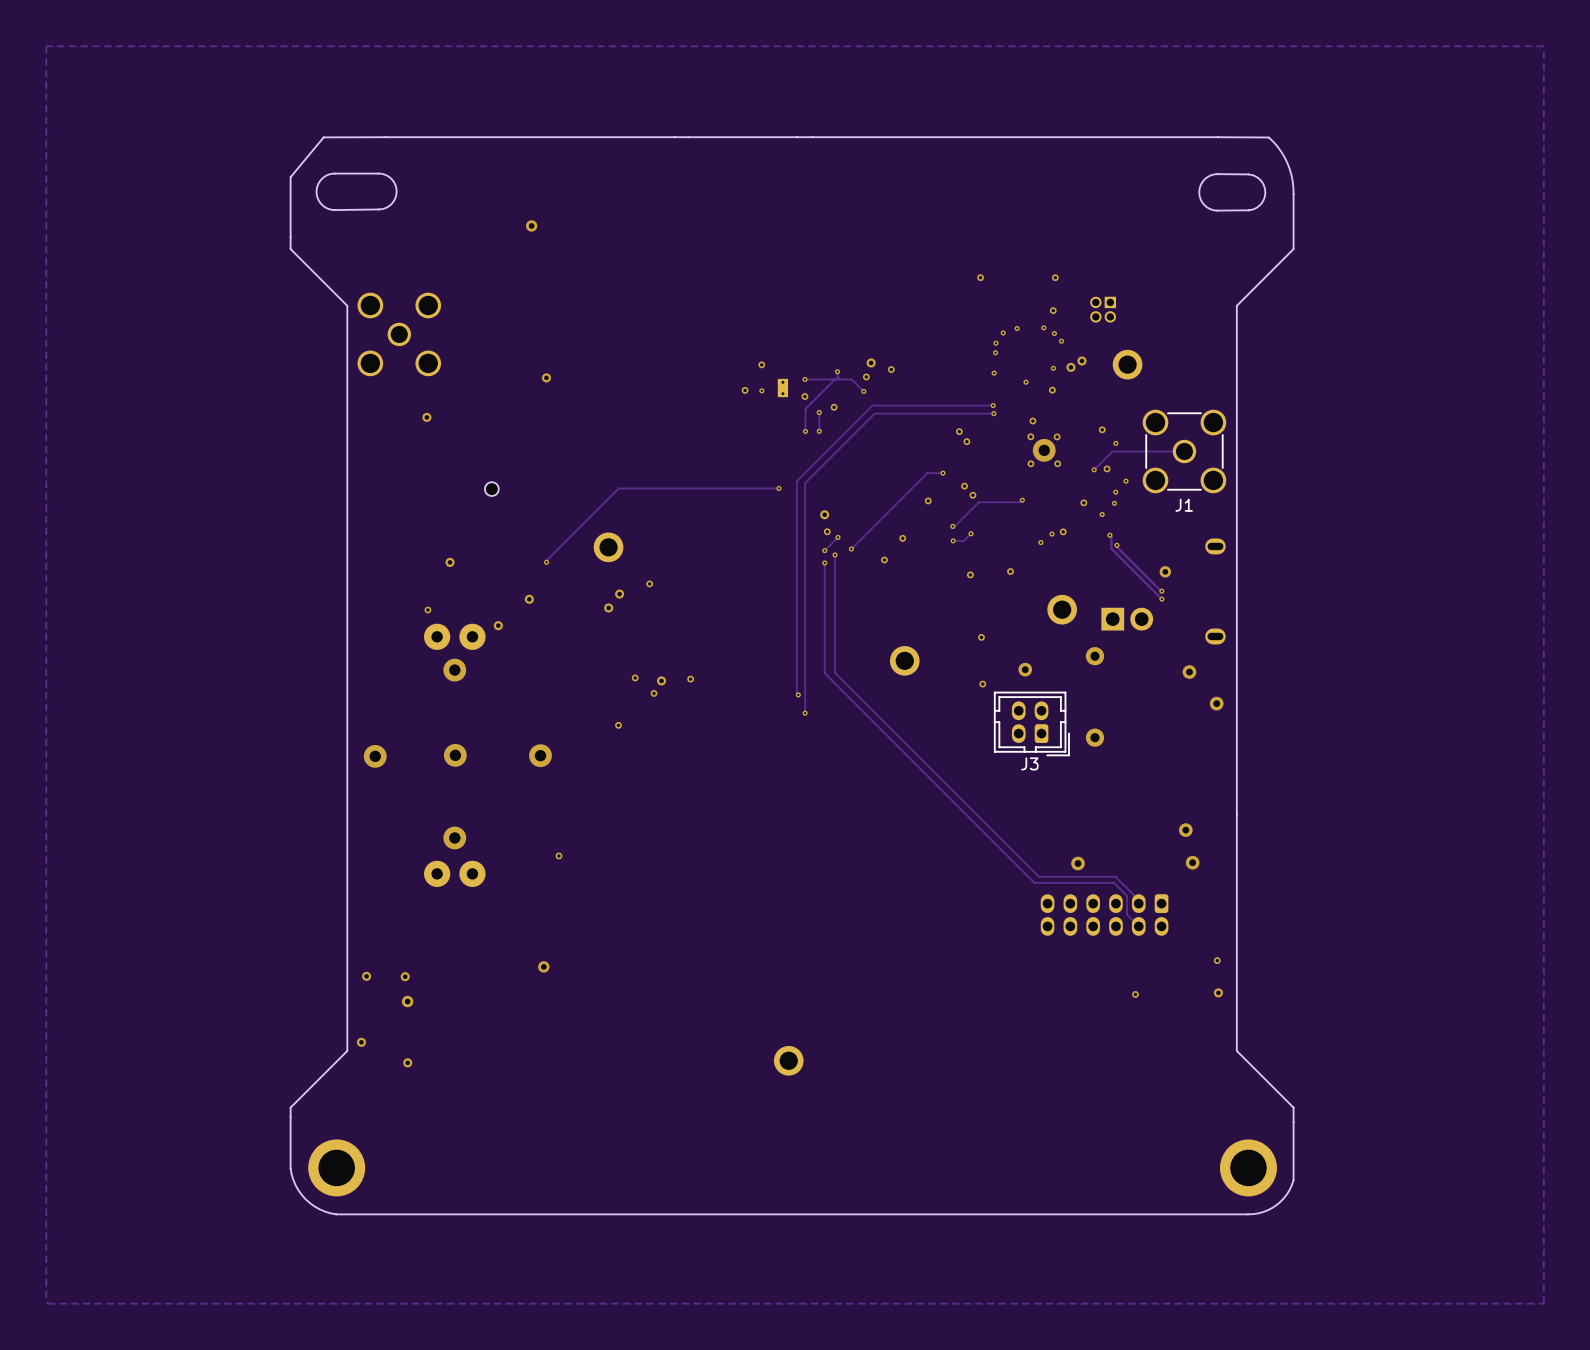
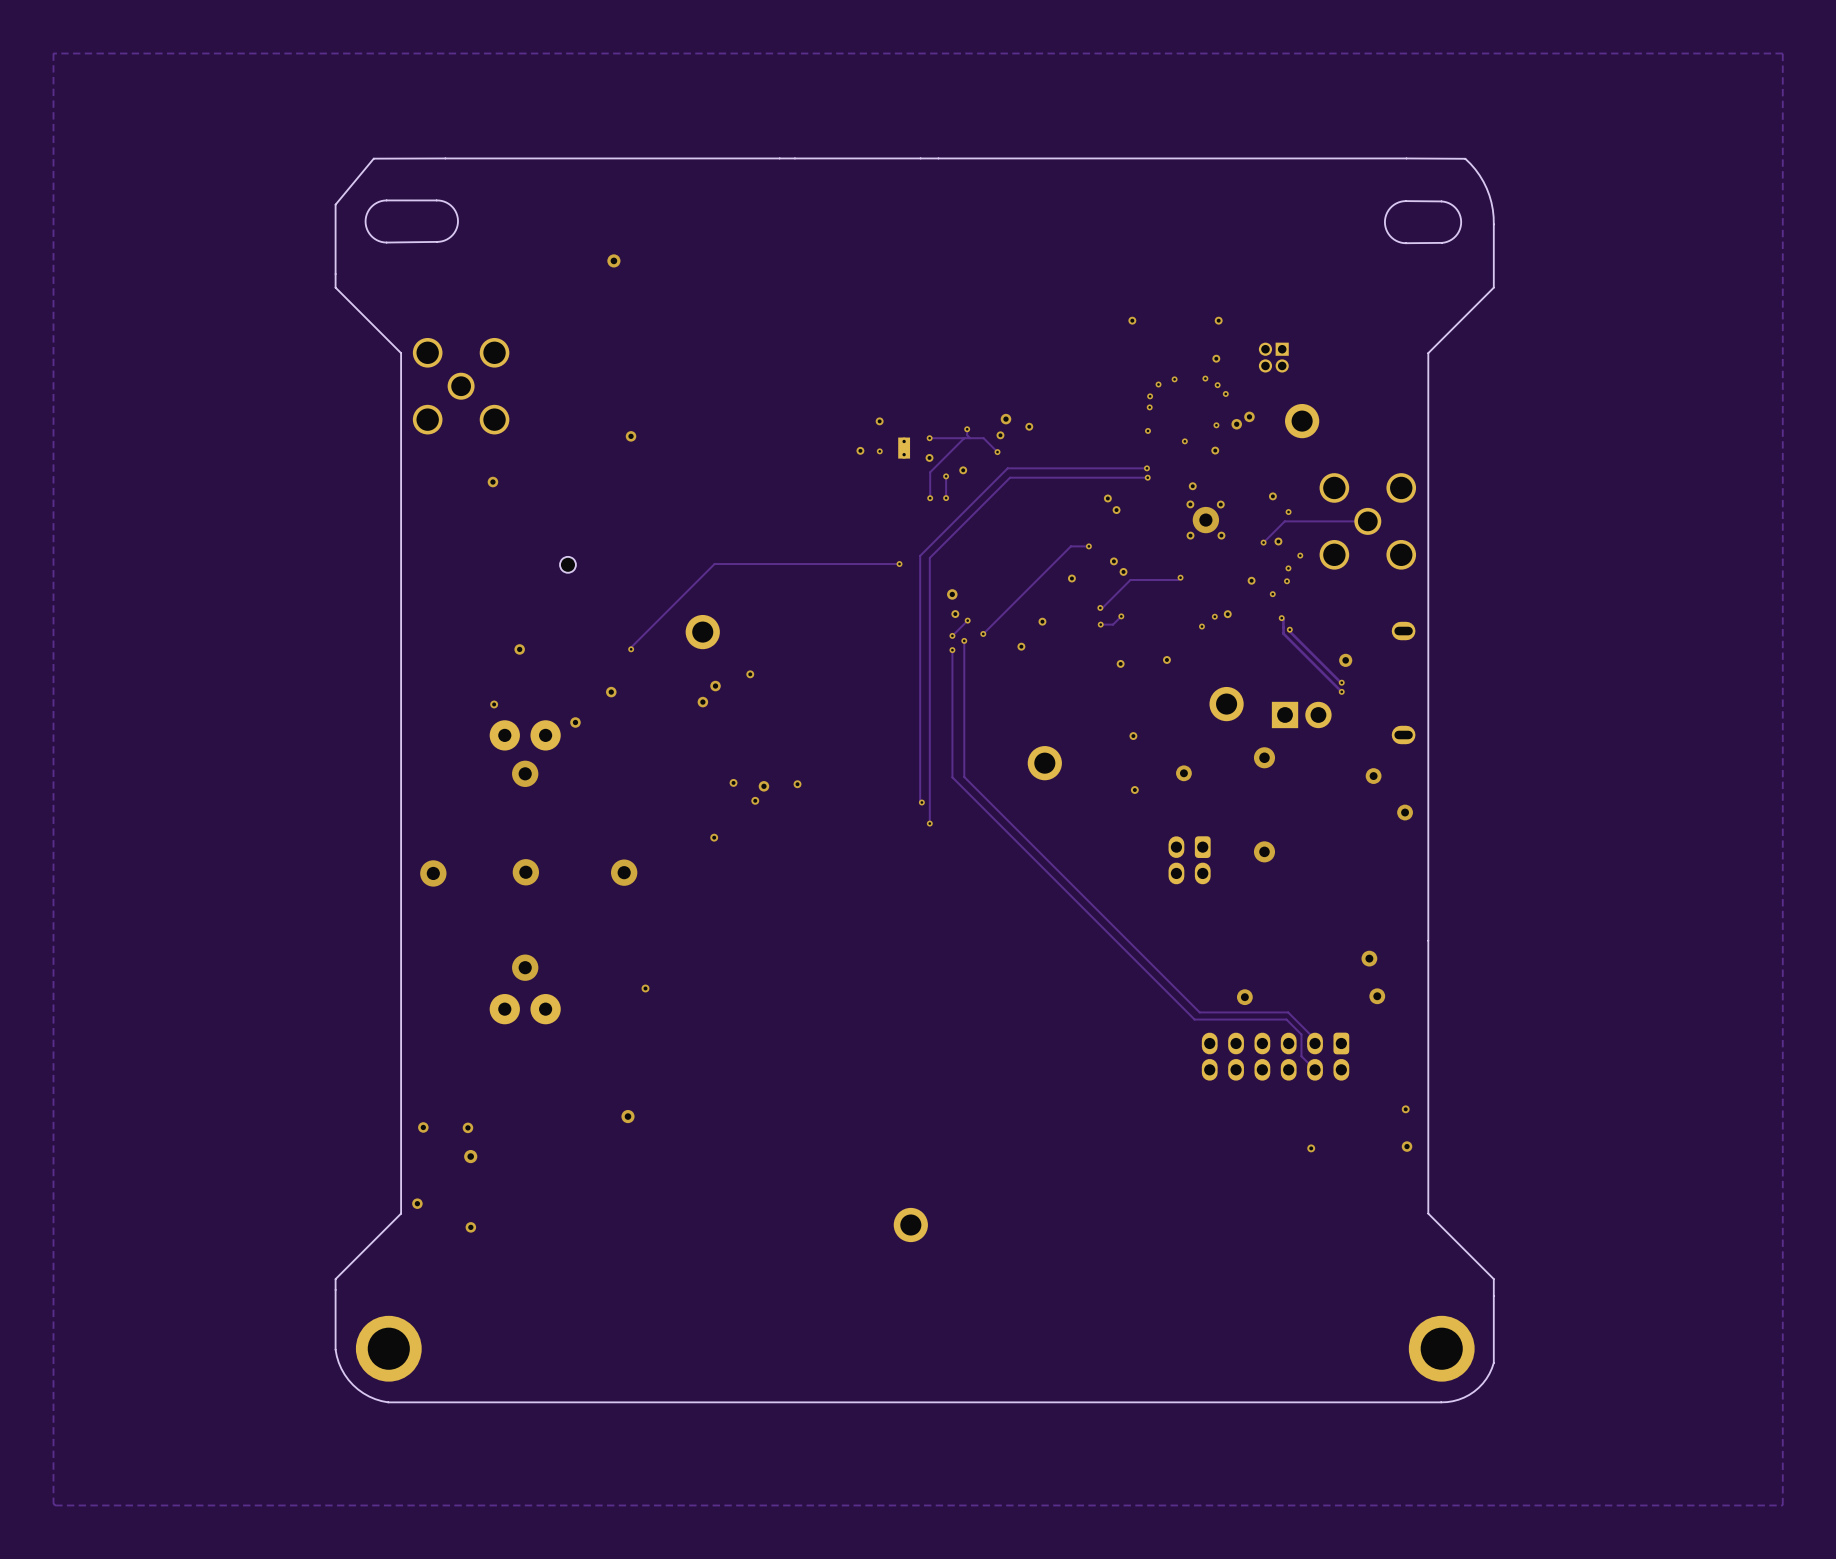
J1 side: bottom (1184, 451) -> top (1367, 521)
J3 side: bottom (1031, 723) -> top (1189, 860)

